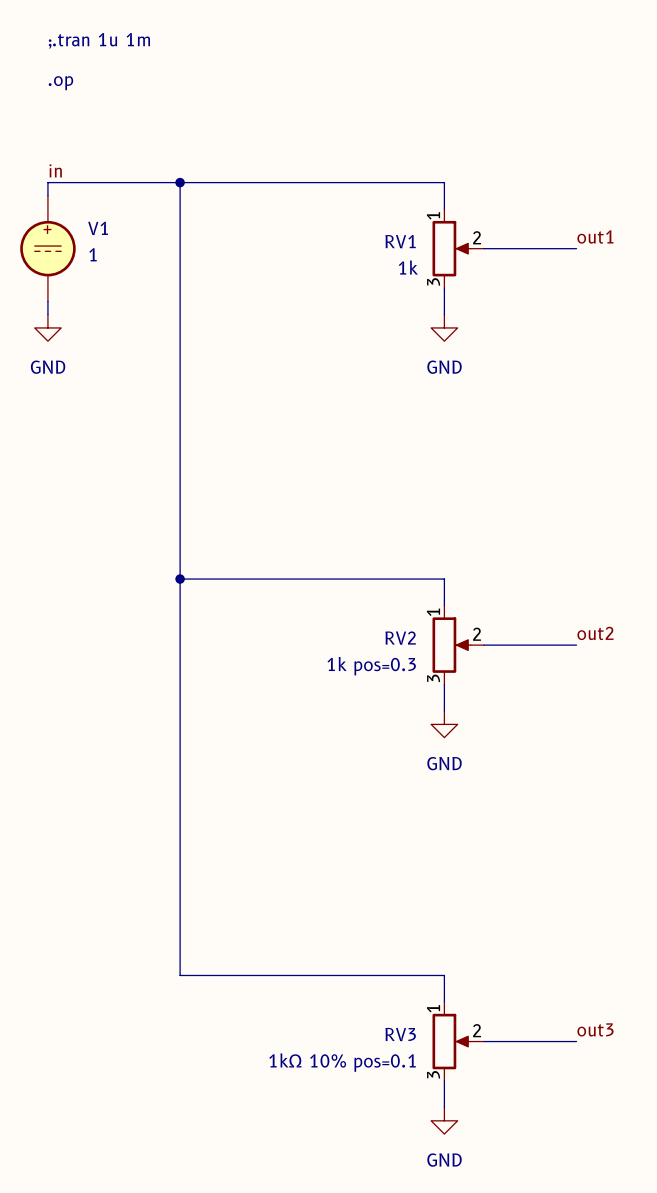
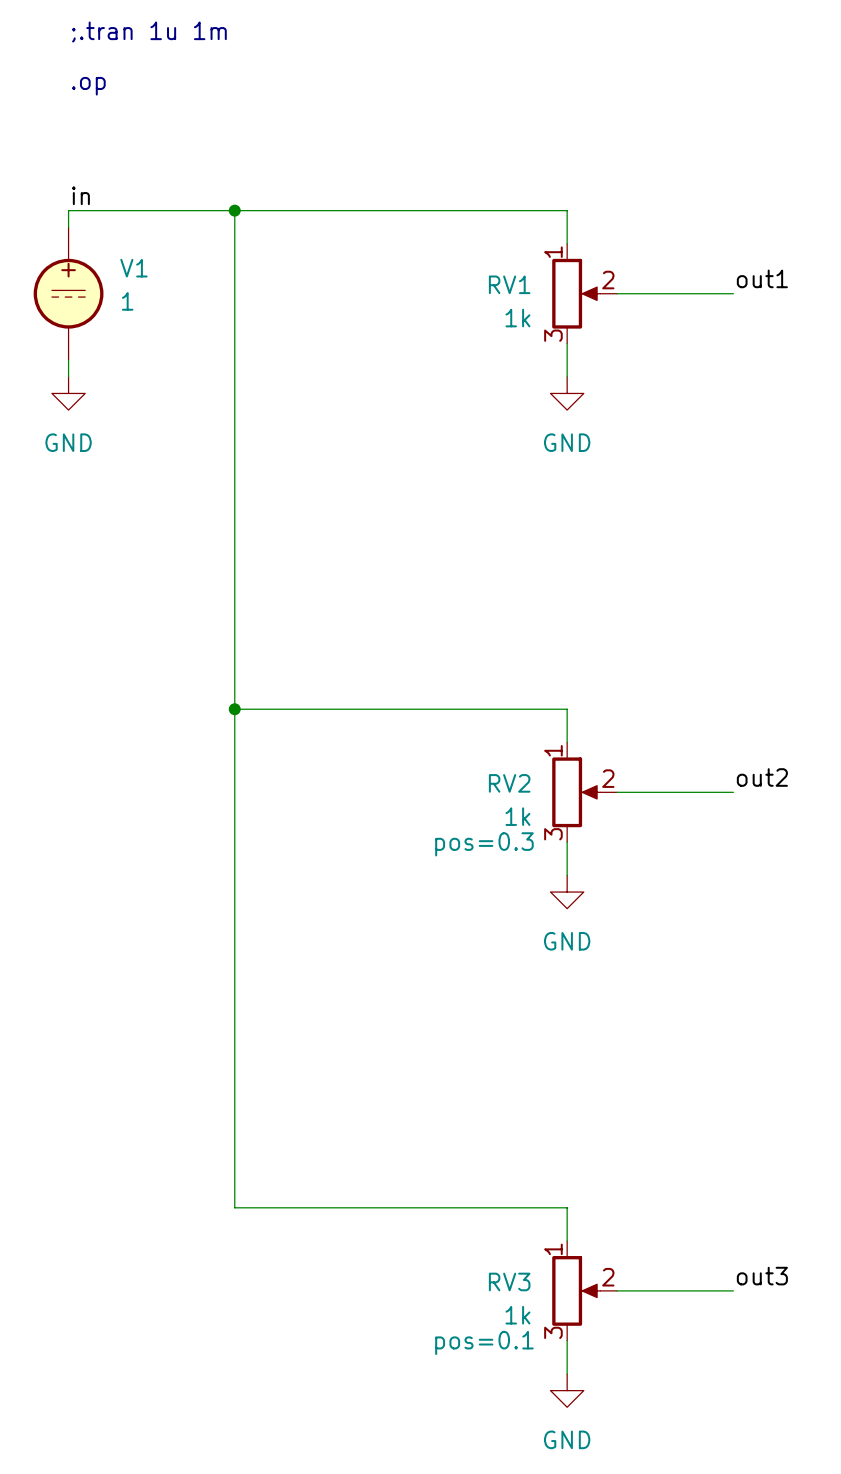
RV2 value: 1k pos=0.3 (371, 666) -> 1k (517, 816)
RV2 text: none -> pos=0.3 (484, 844)
RV3 value: 1kΩ 10% pos=0.1 (342, 1062) -> 1k (517, 1315)
RV3 text: none -> pos=0.1 (484, 1342)

